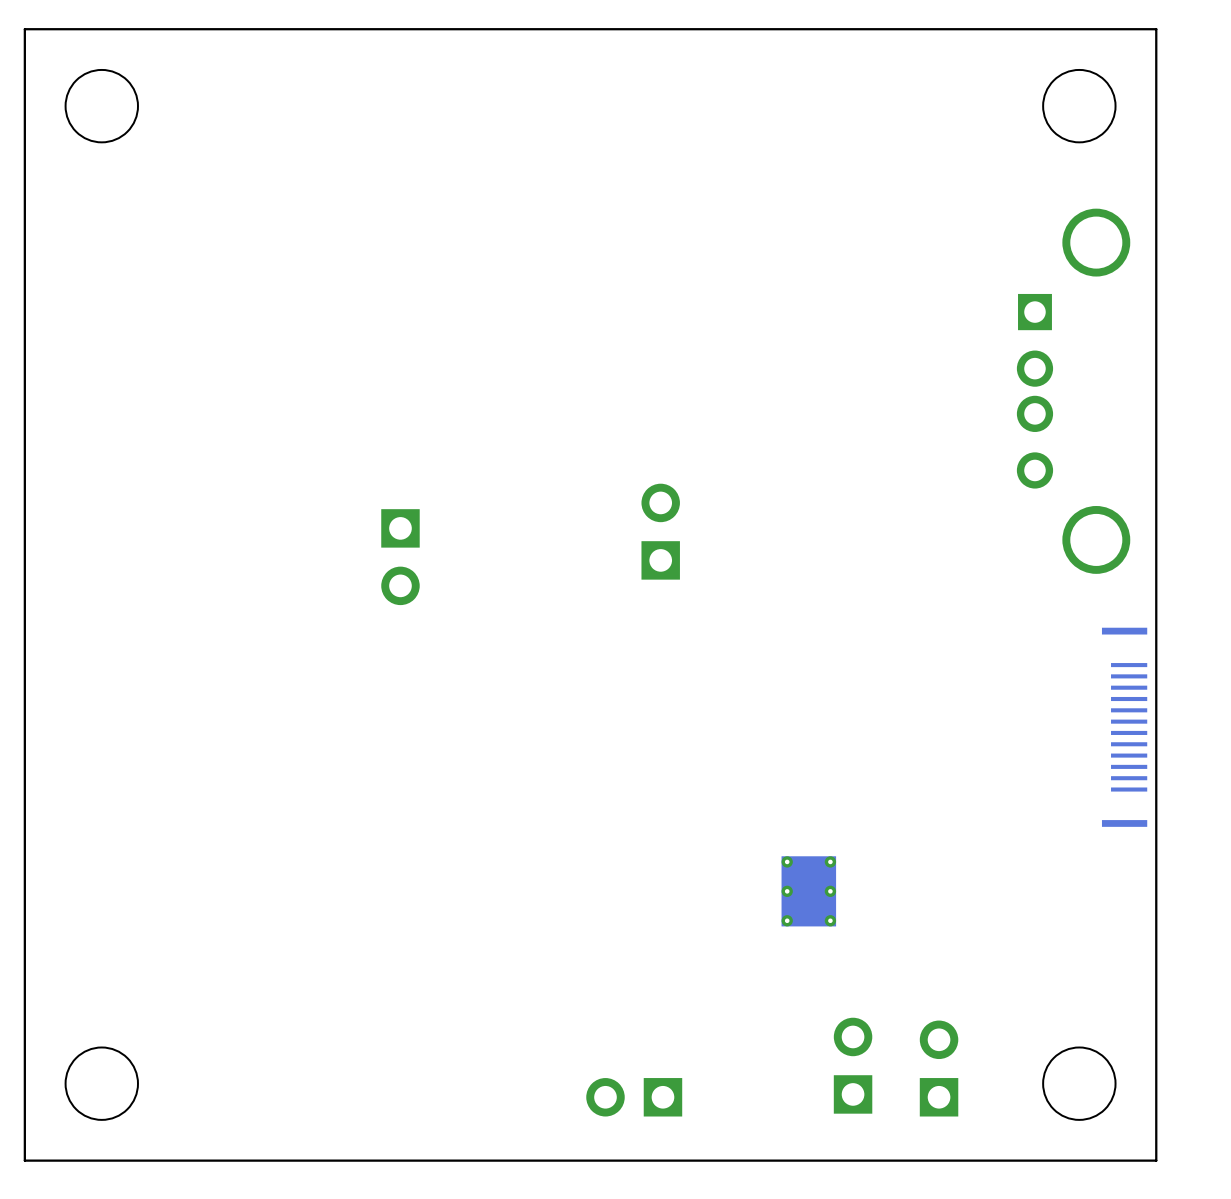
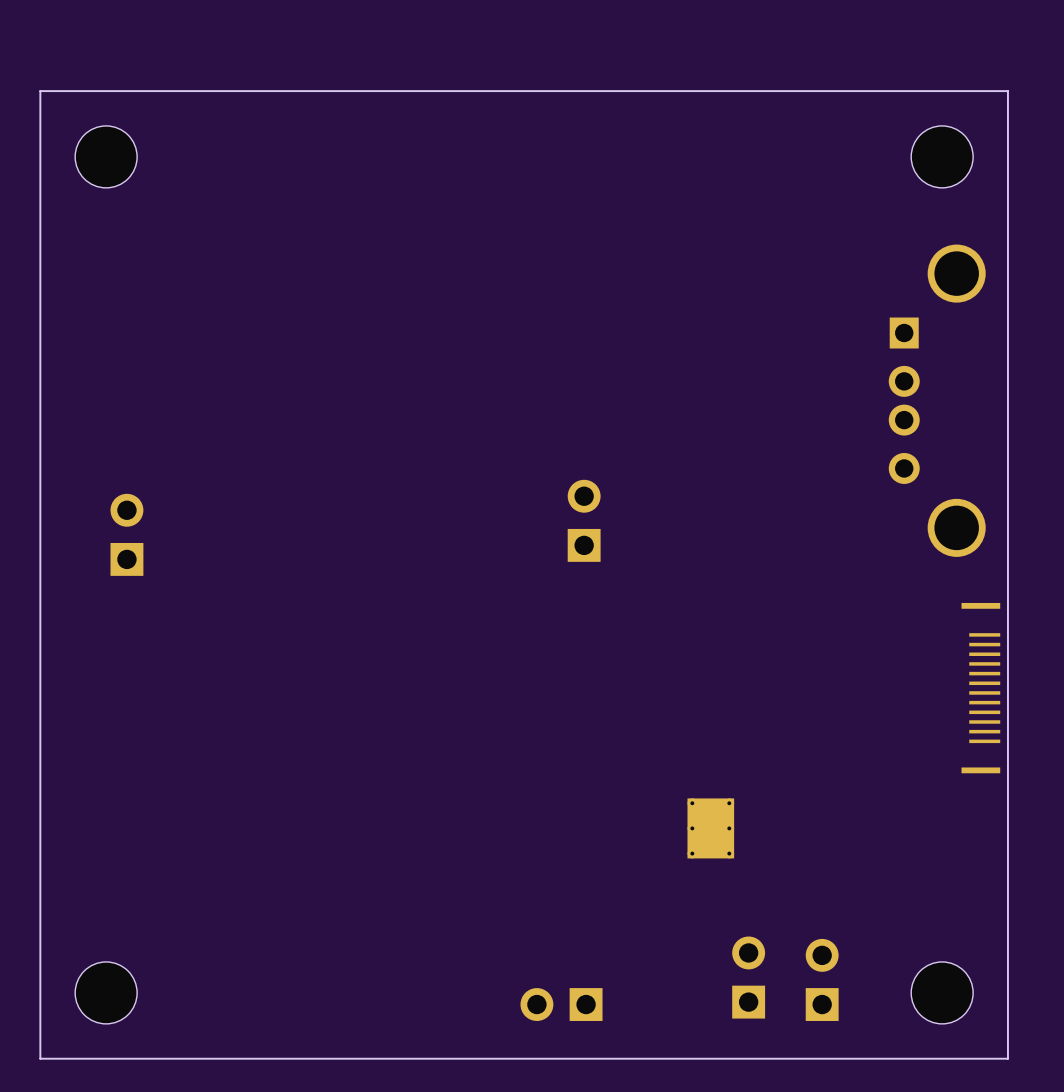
part rotation: 0° (400, 557) -> 180° (126, 534)
part position: (400, 557) -> (126, 534)

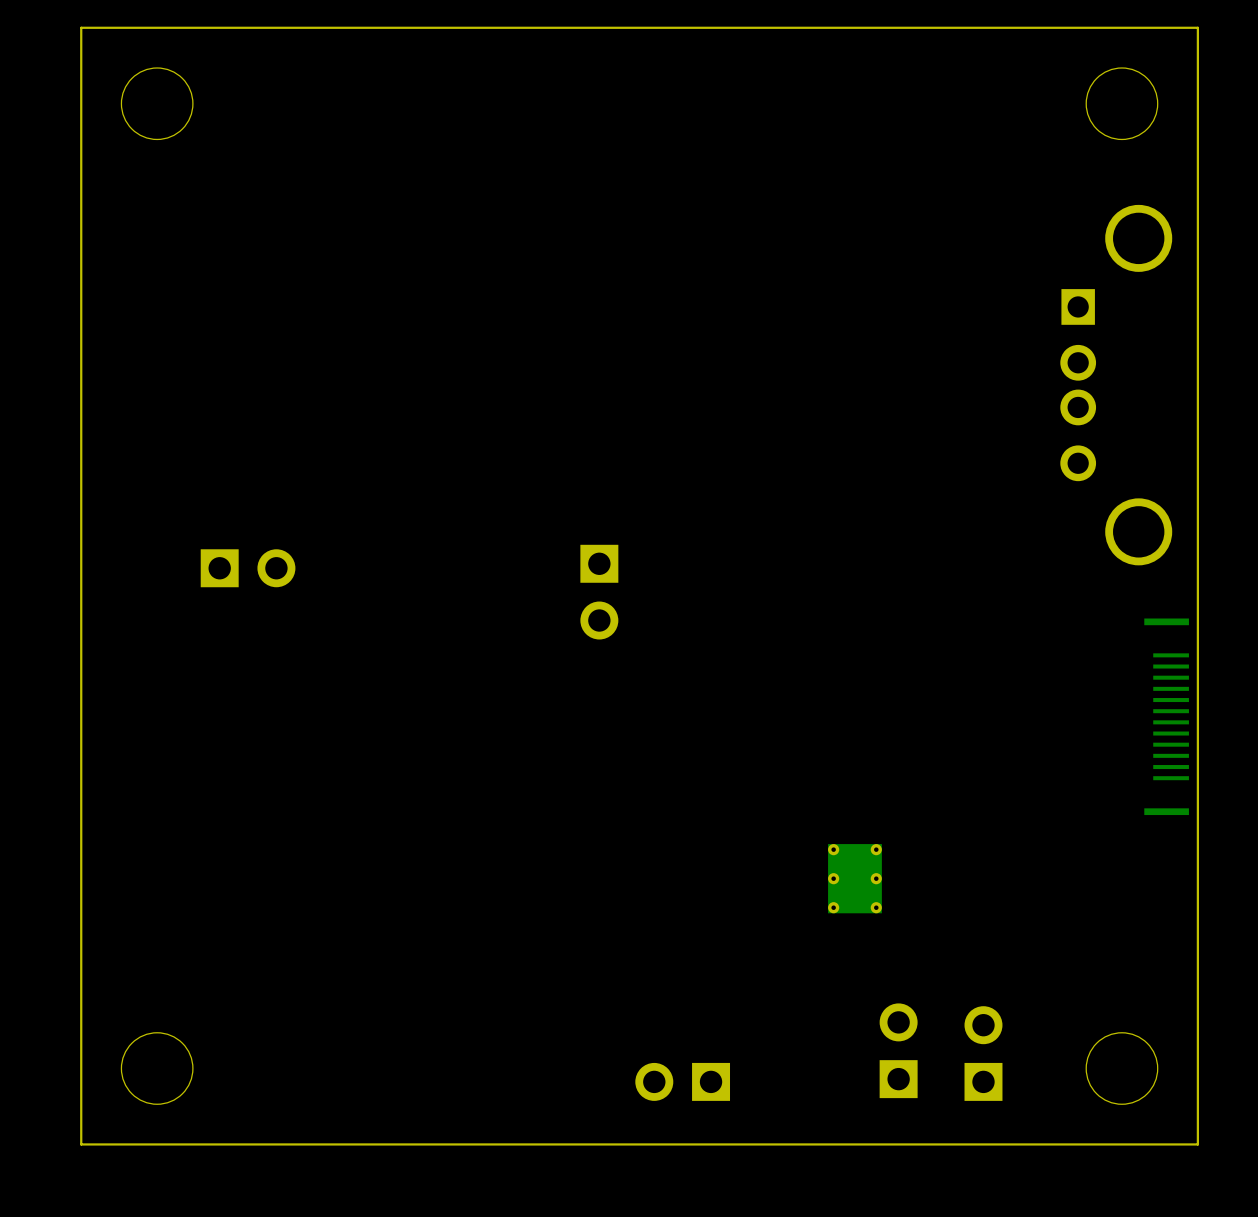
part rotation: 0° (584, 520) -> 180° (599, 592)
part position: (584, 520) -> (599, 592)
part rotation: 0° (126, 534) -> 90° clockwise (248, 568)
part position: (126, 534) -> (248, 568)

